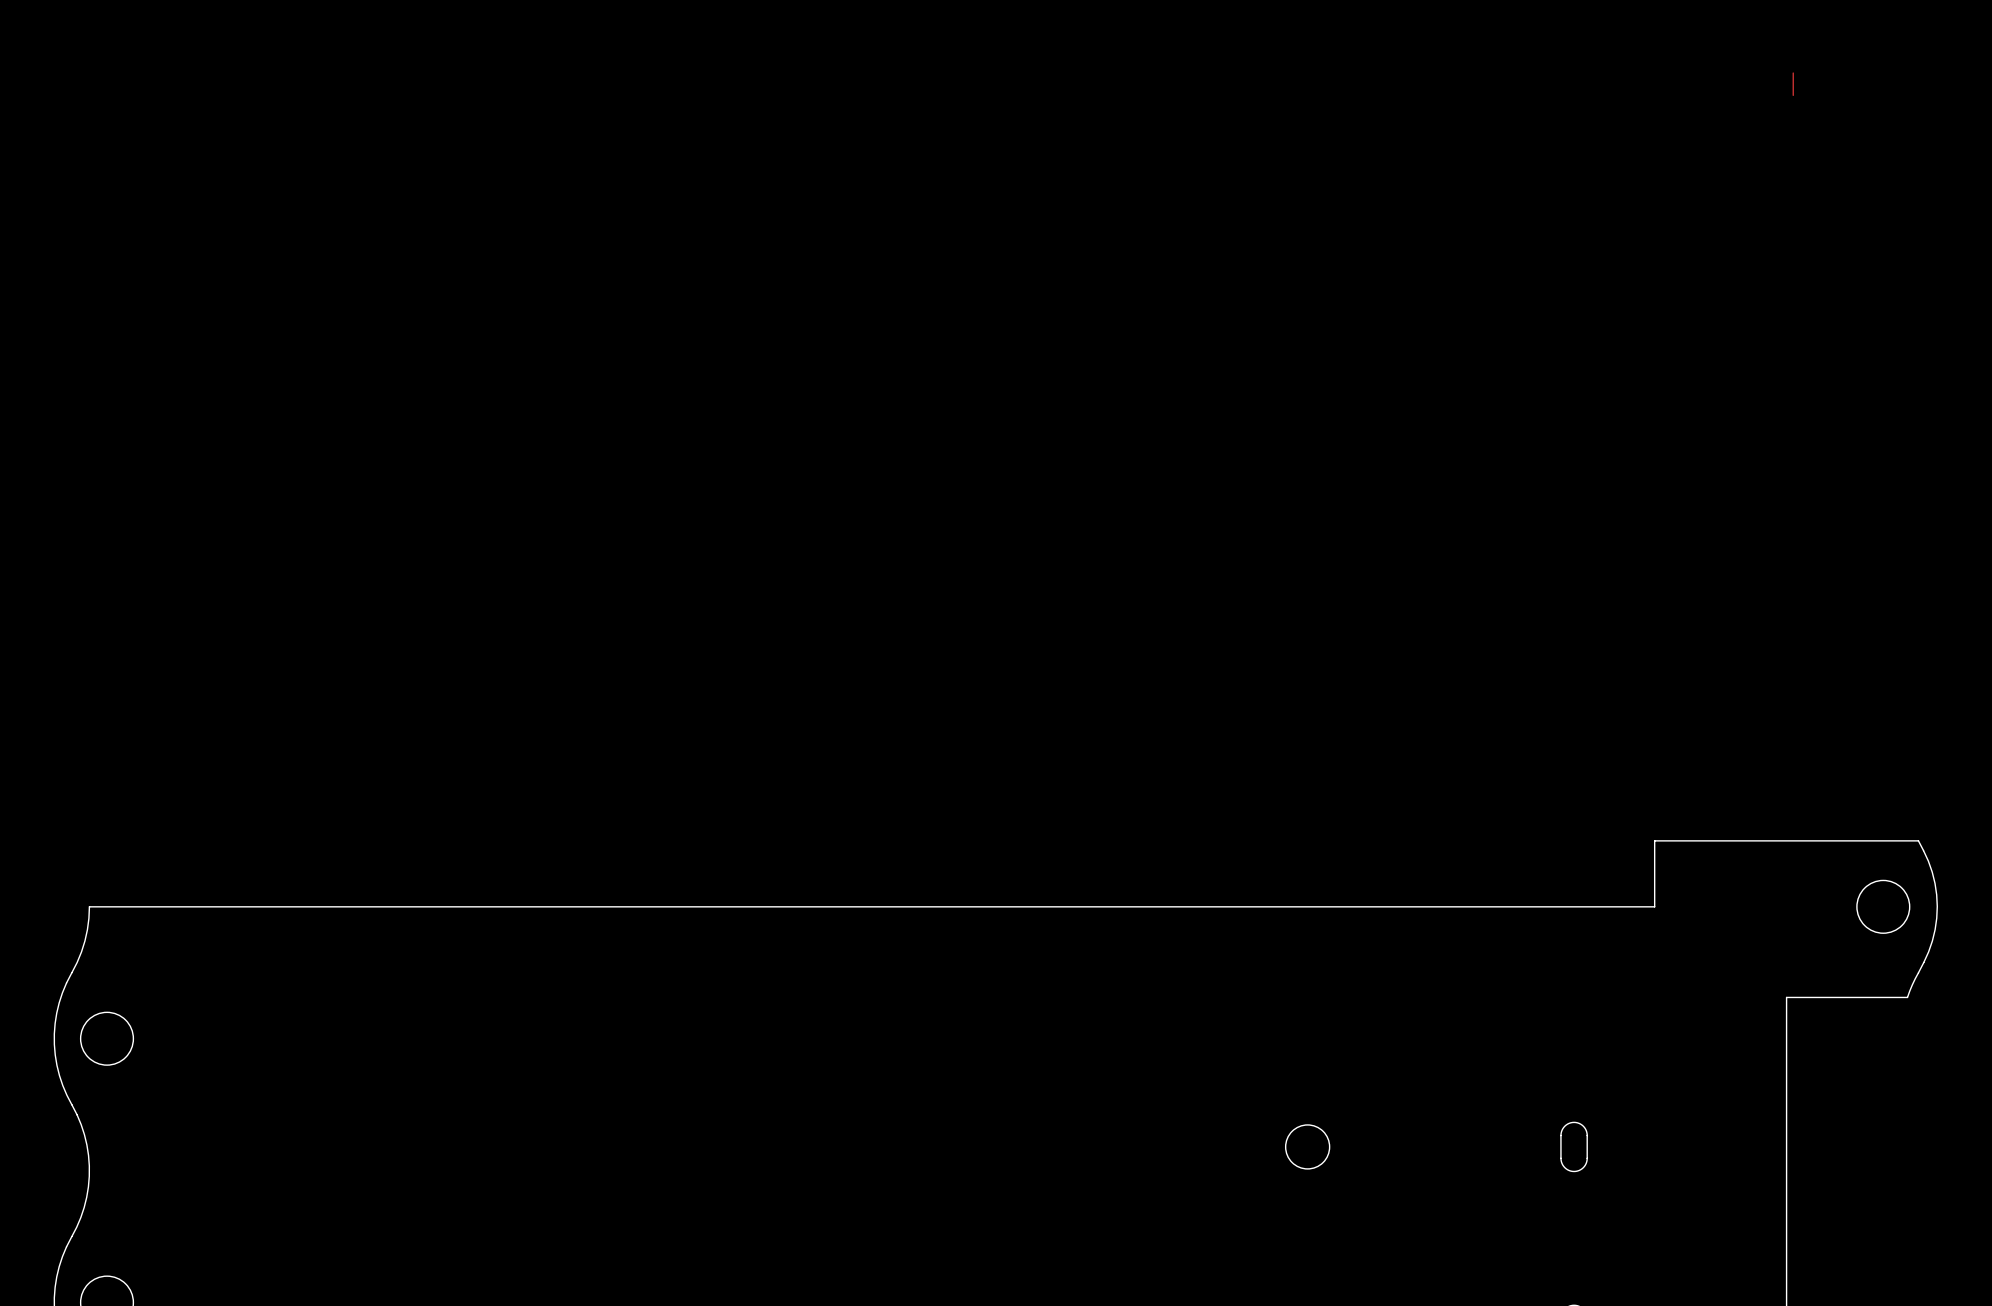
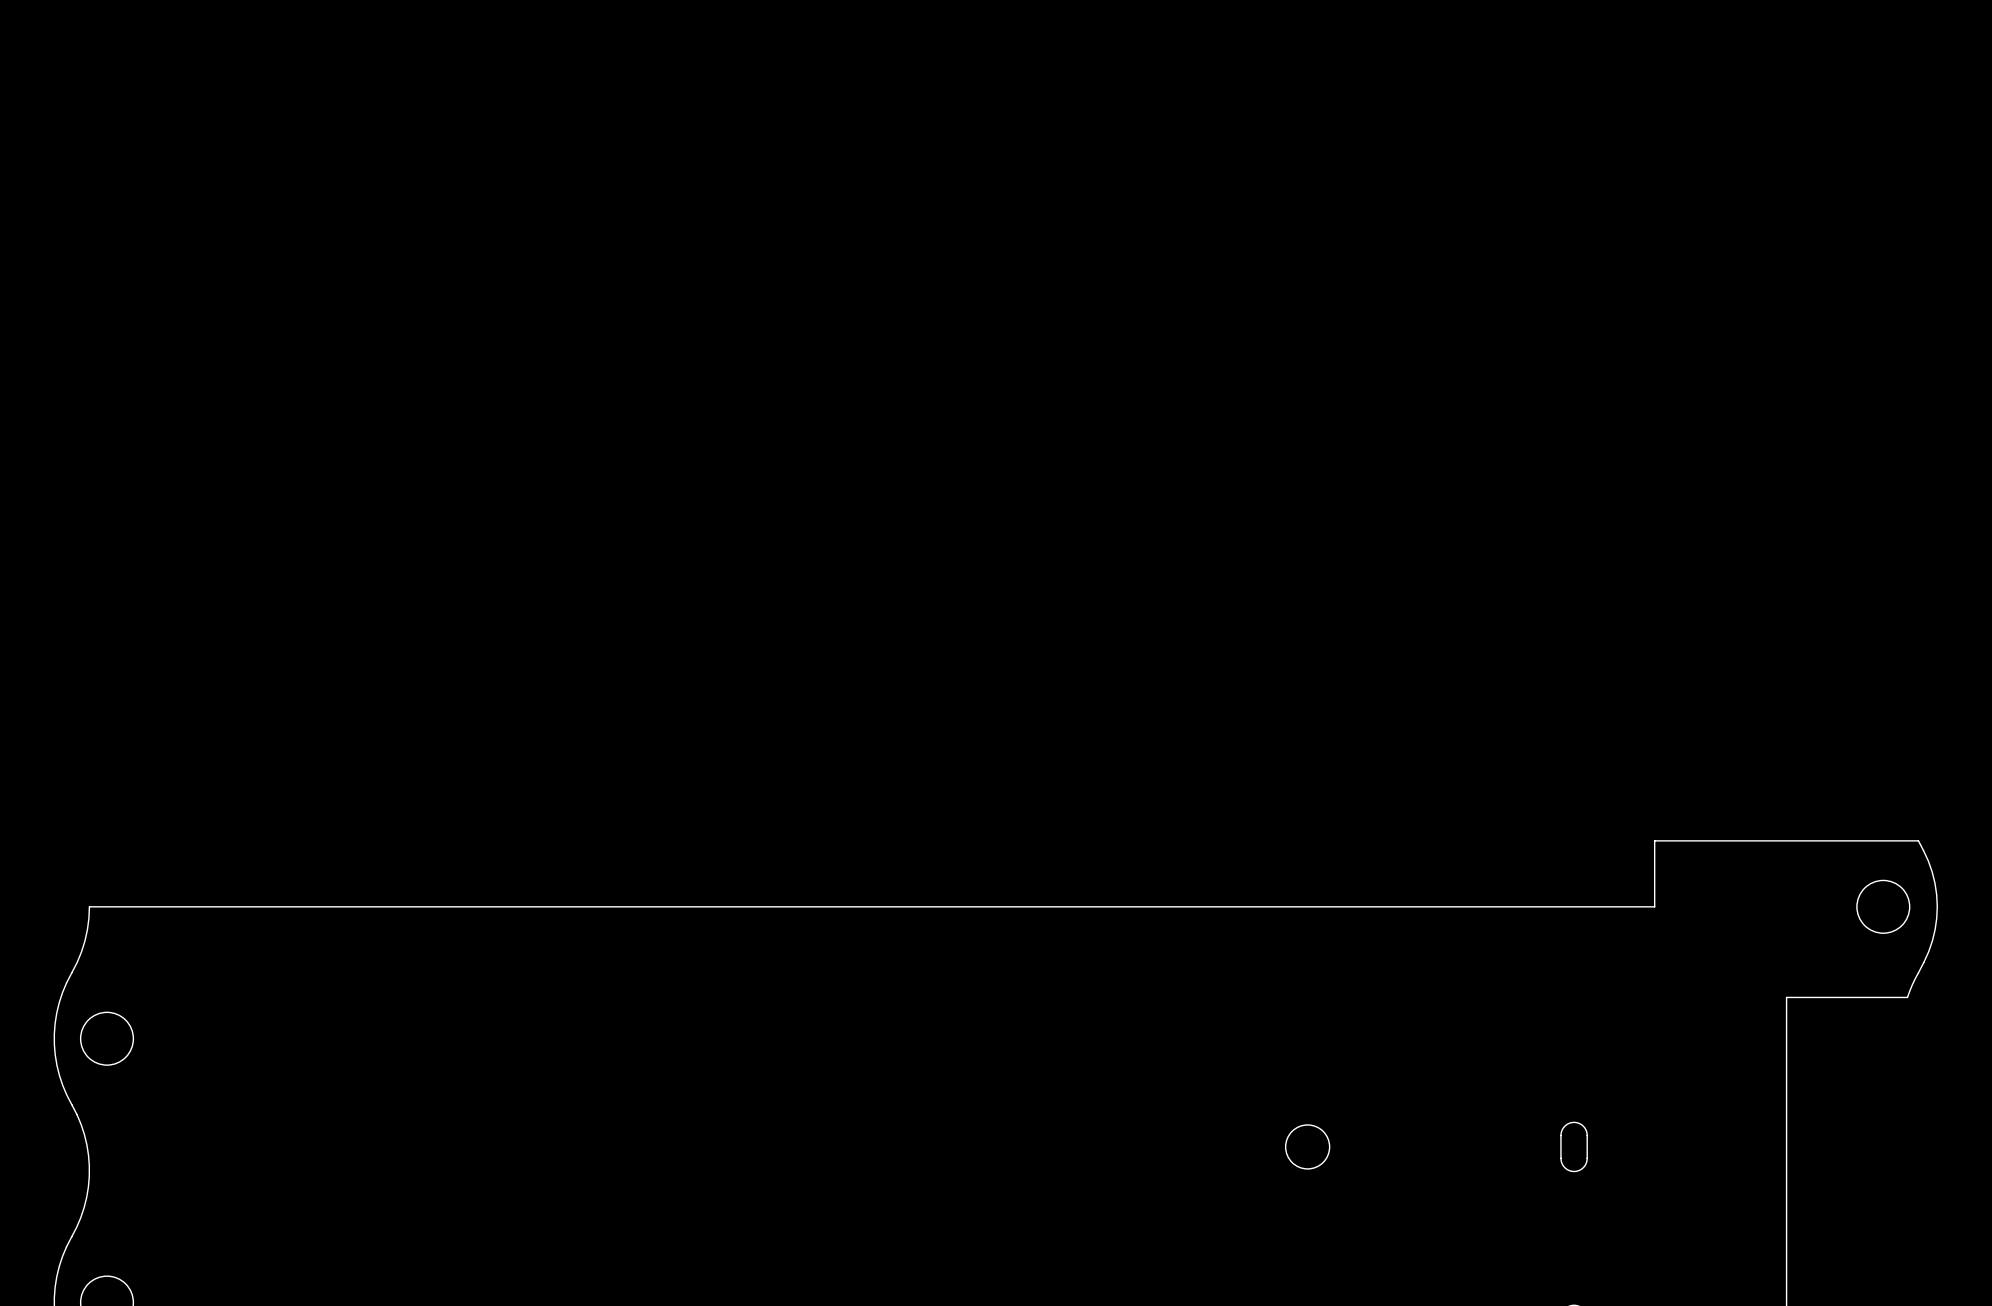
top track: (1793, 73) (1793, 95) -> none

